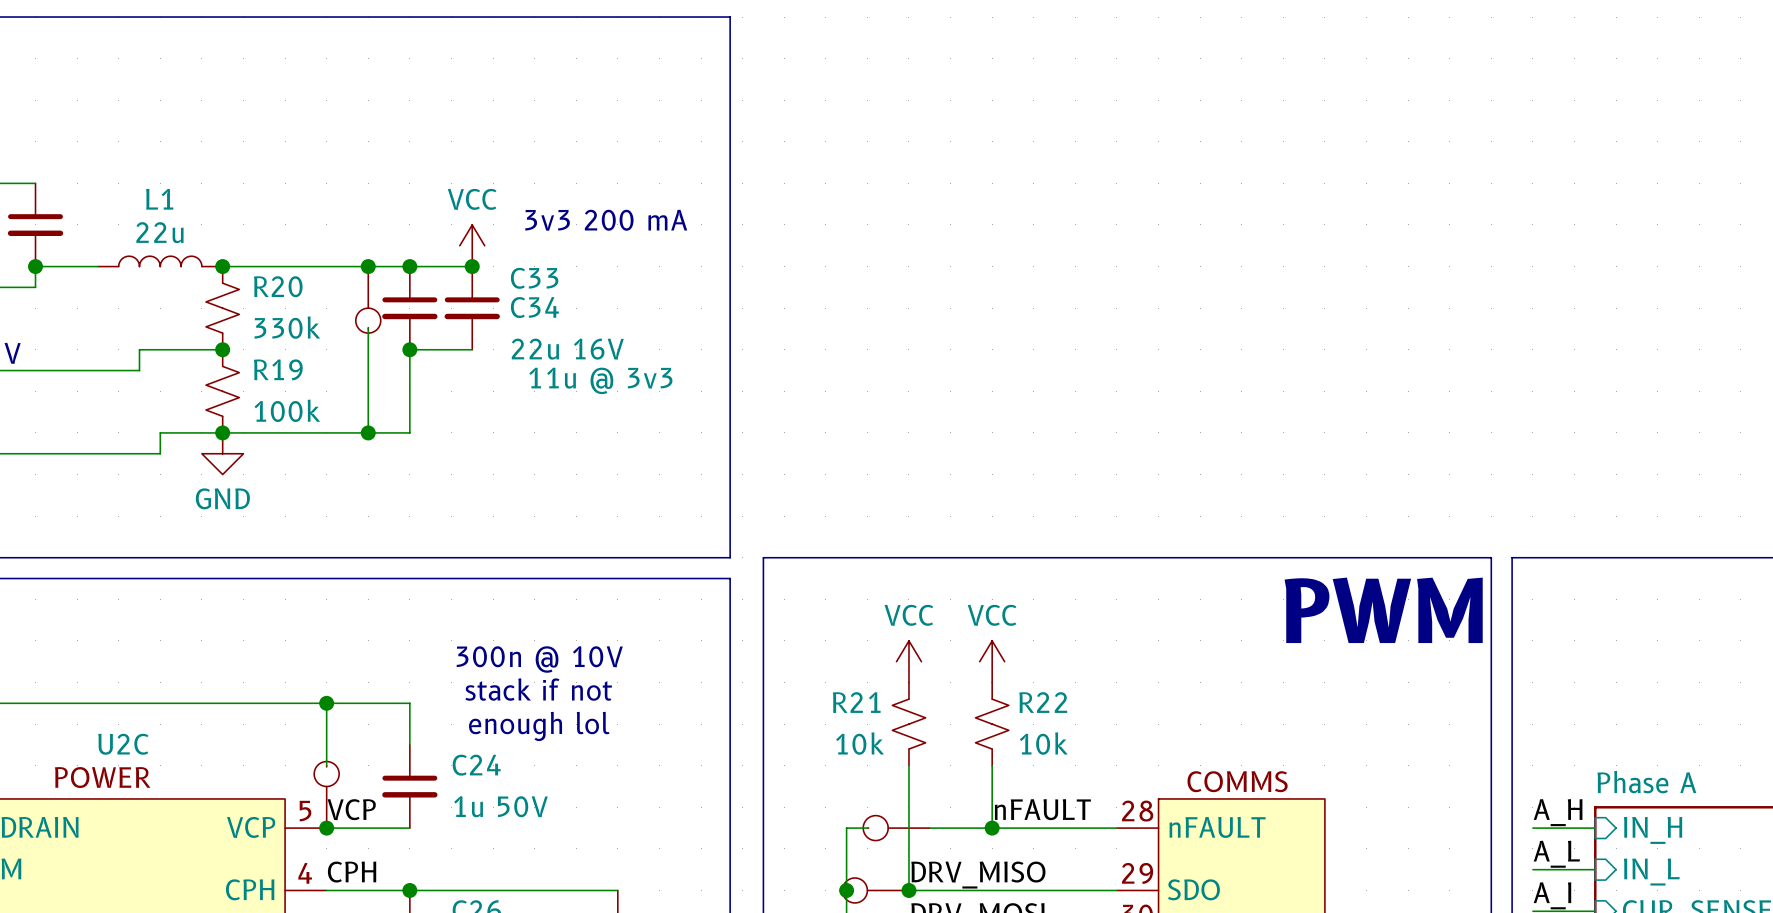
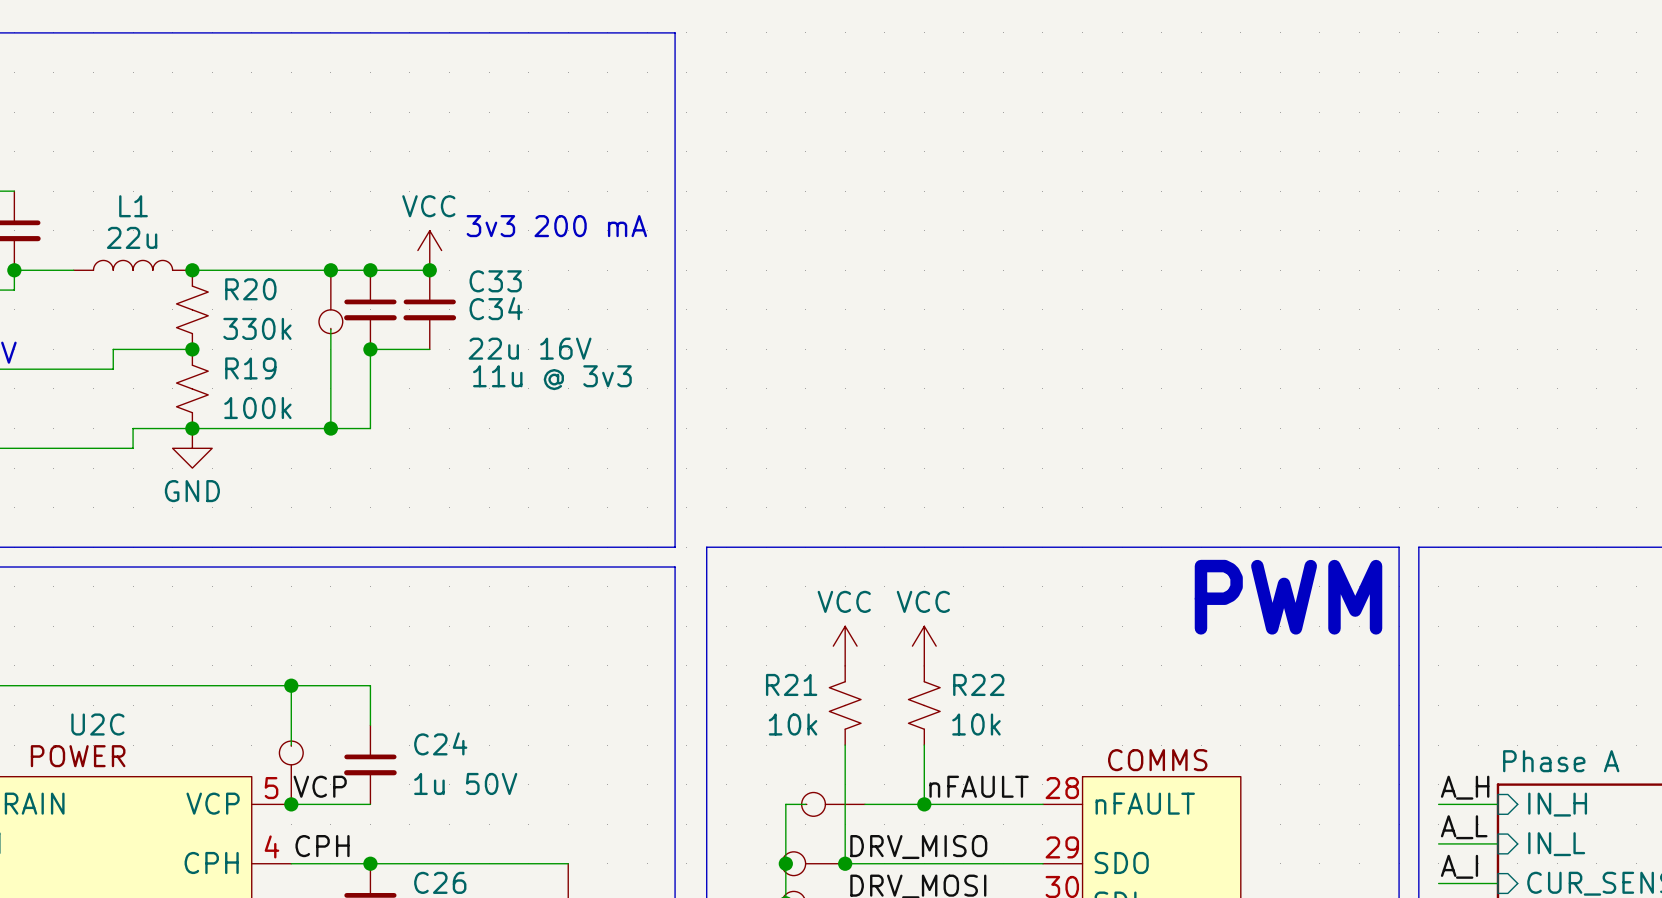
text: 300n @ 10V (539, 659) -> none
text: stack if not (538, 689) -> none
text: enough lol (539, 726) -> none

